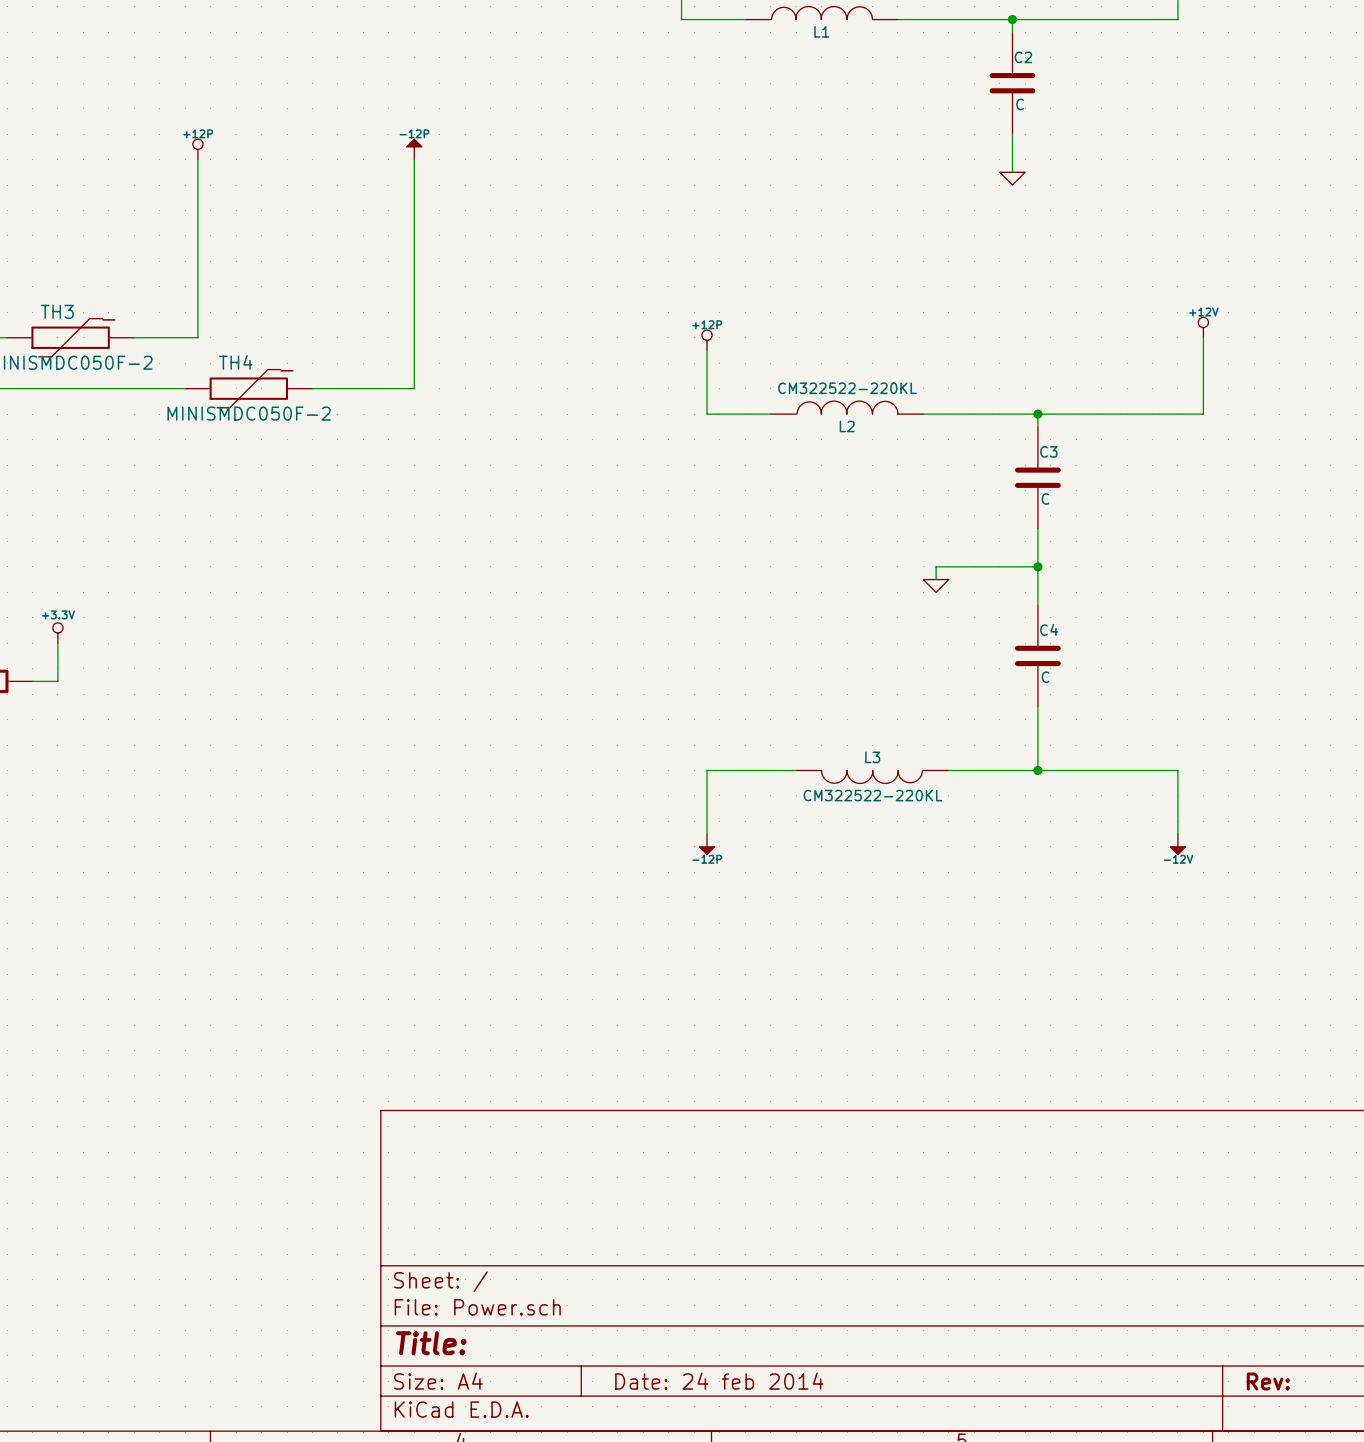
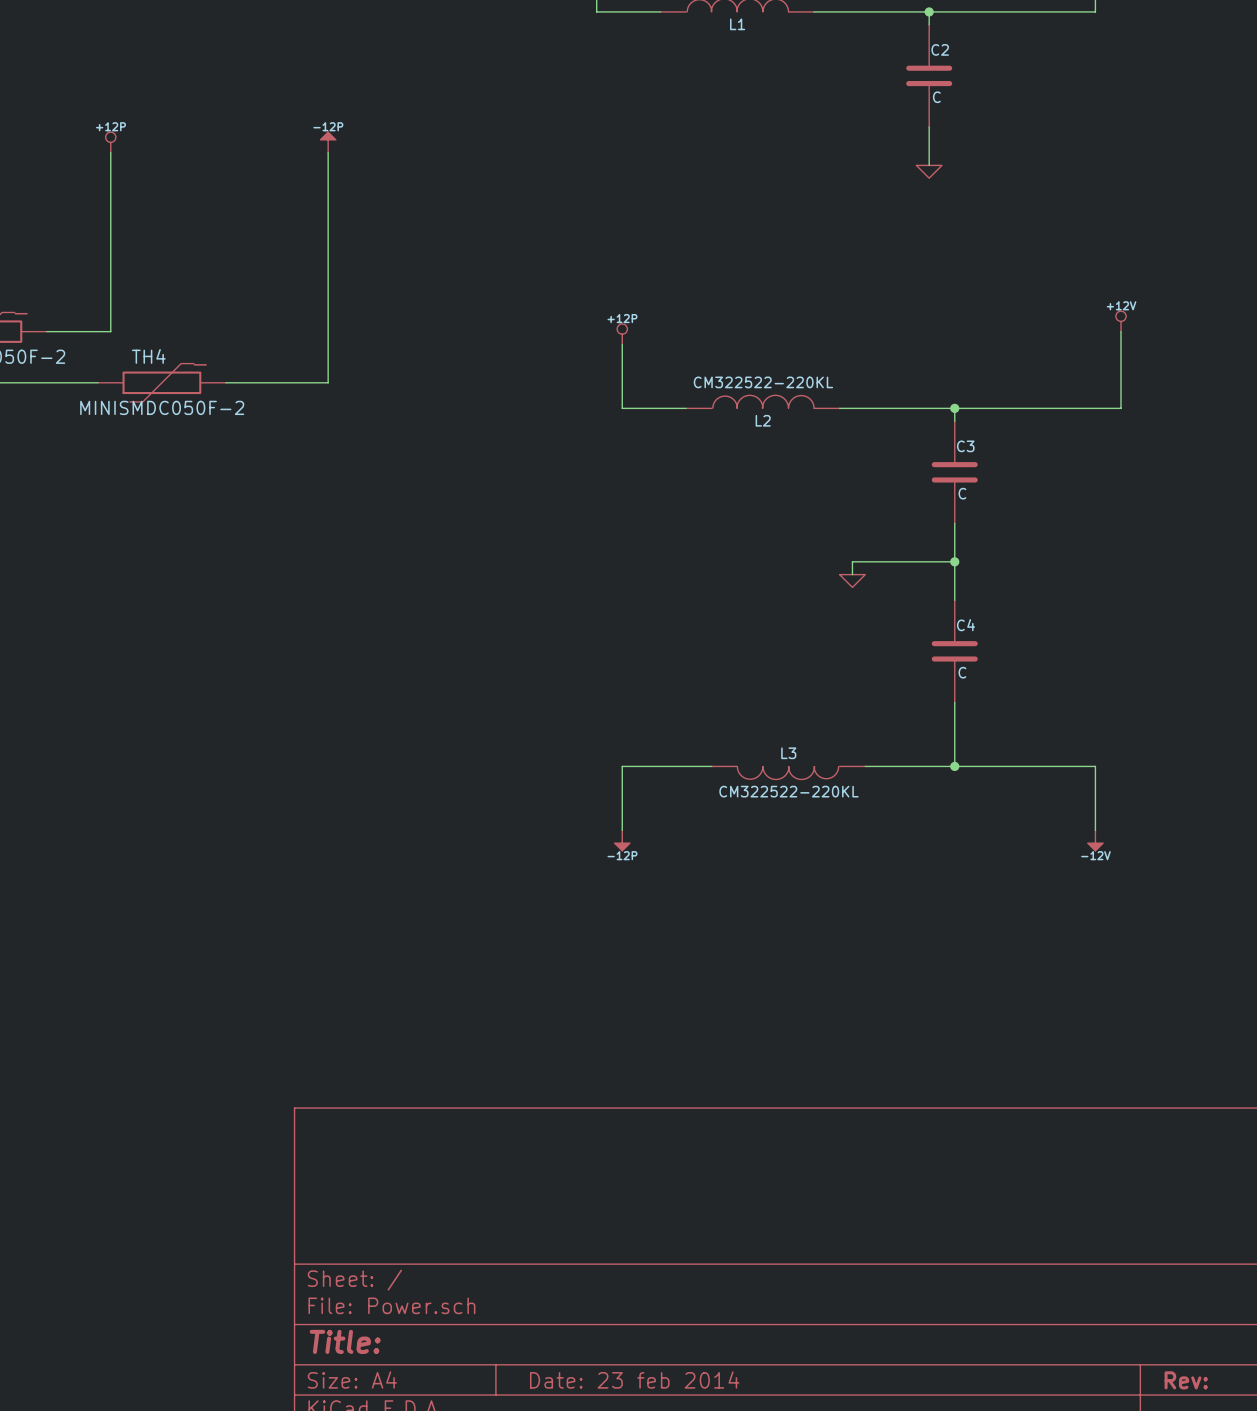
title block: Date: 24 feb 2014 (719, 1381) -> Date: 23 feb 2014 (634, 1380)

